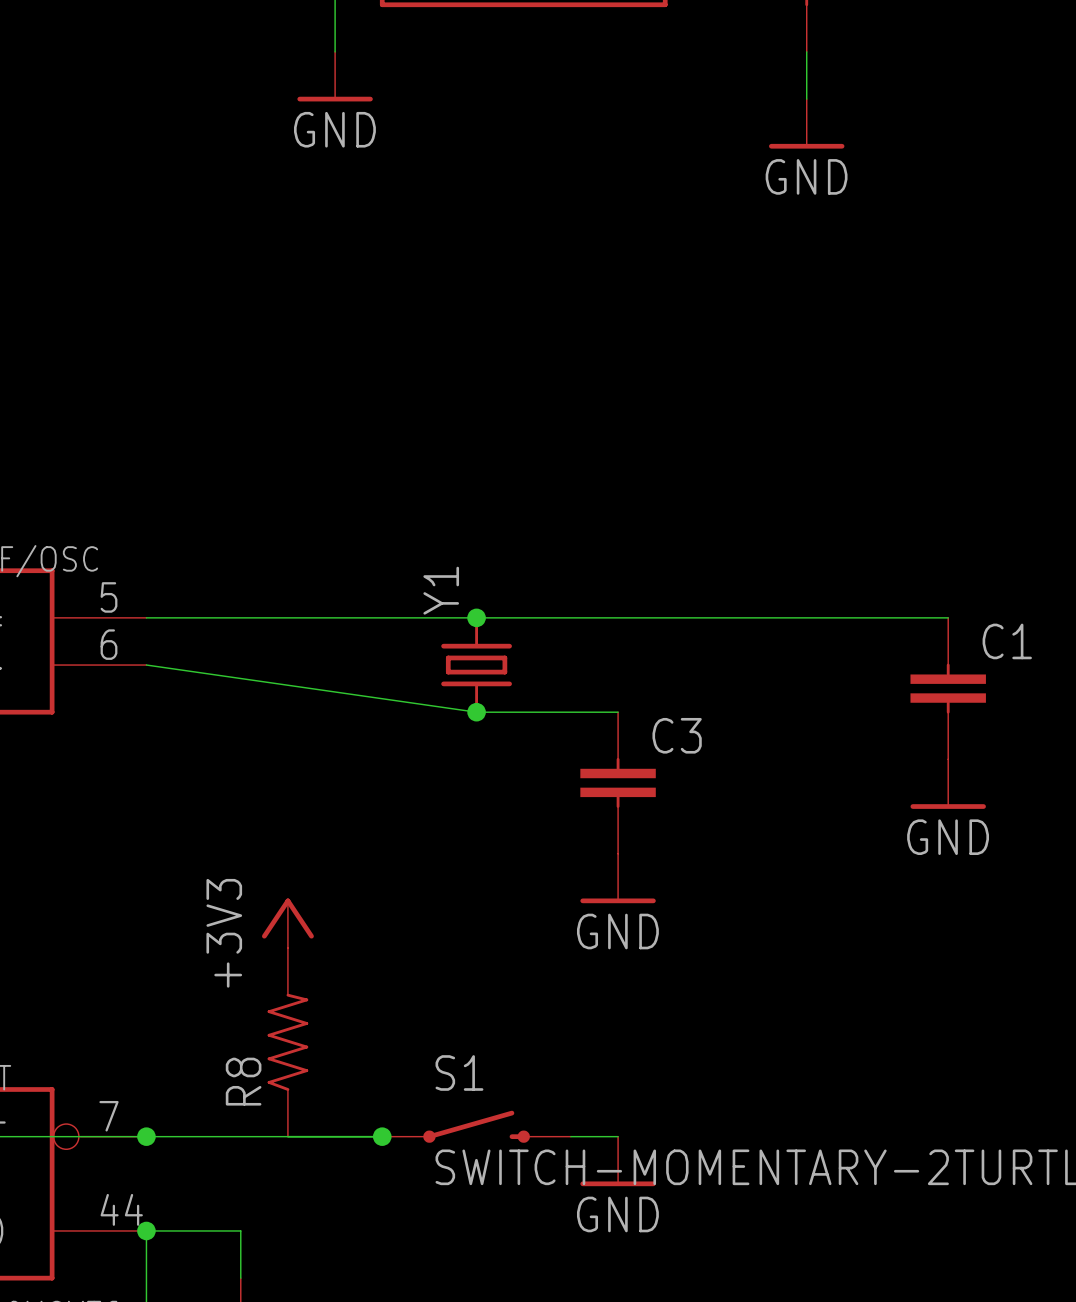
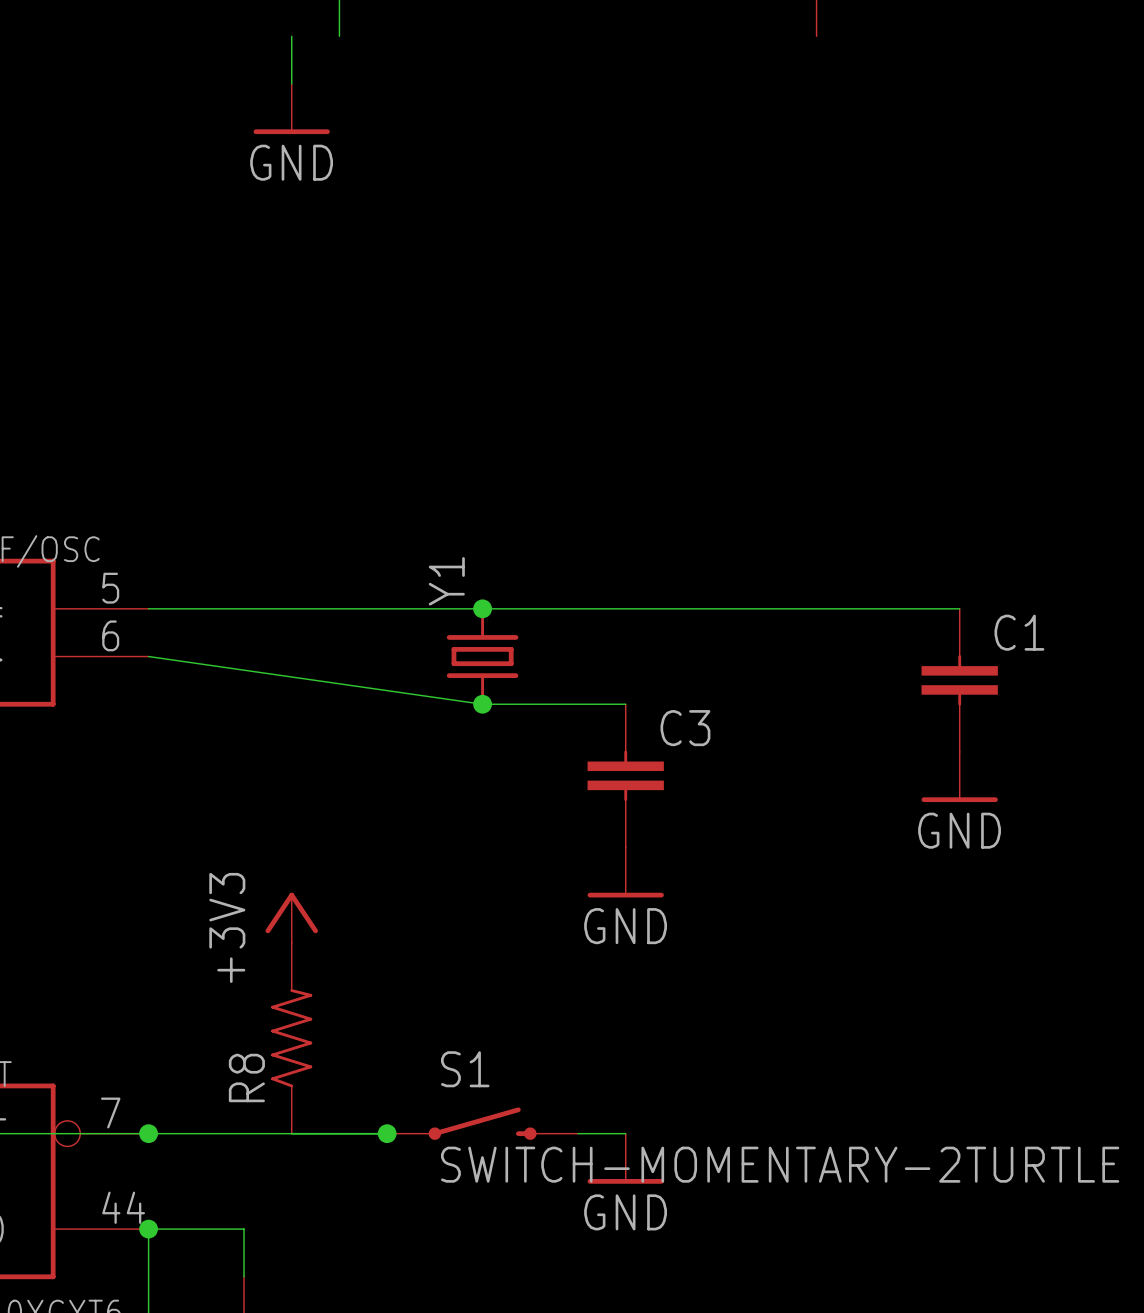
wire: none -> (291, 36) (291, 83)
wire: (806, 51) (806, 99) -> none
power symbol position: GND (335, 76) -> GND (291, 109)
power symbol: GND (806, 123) -> none

